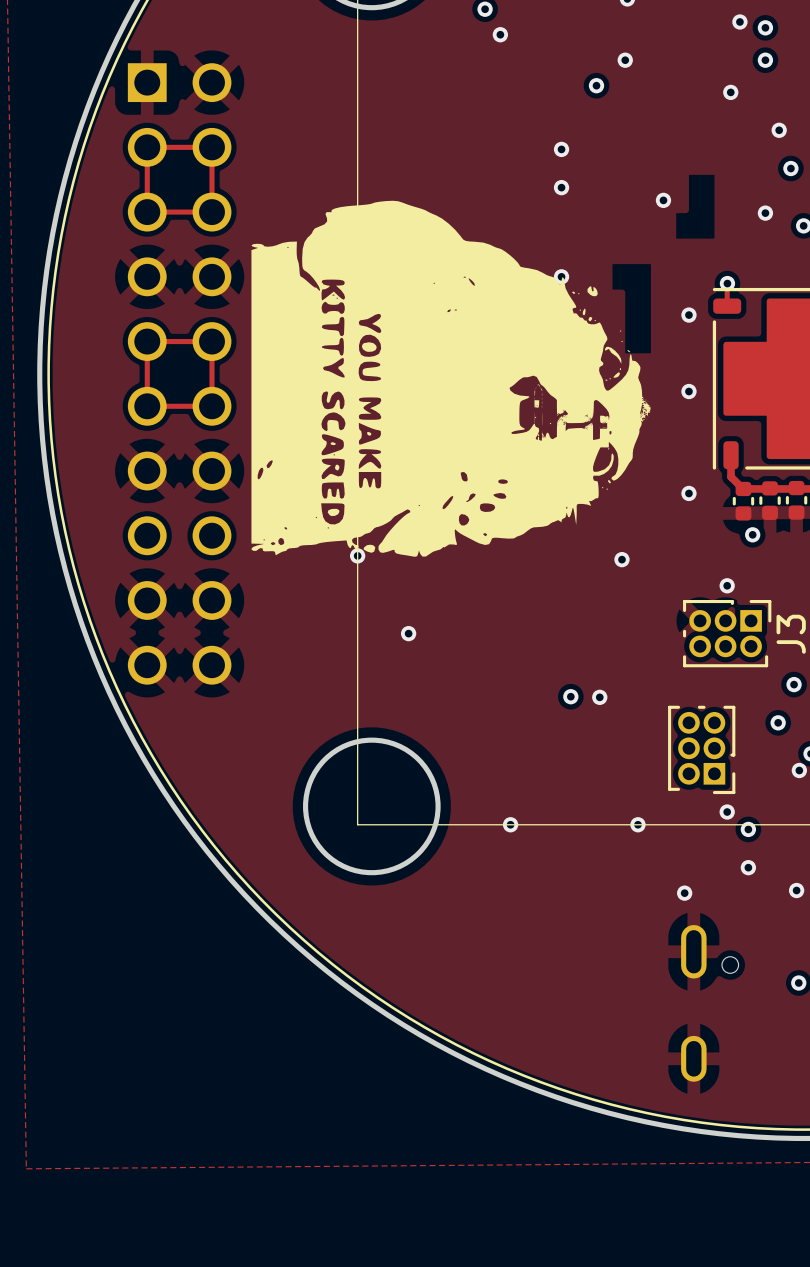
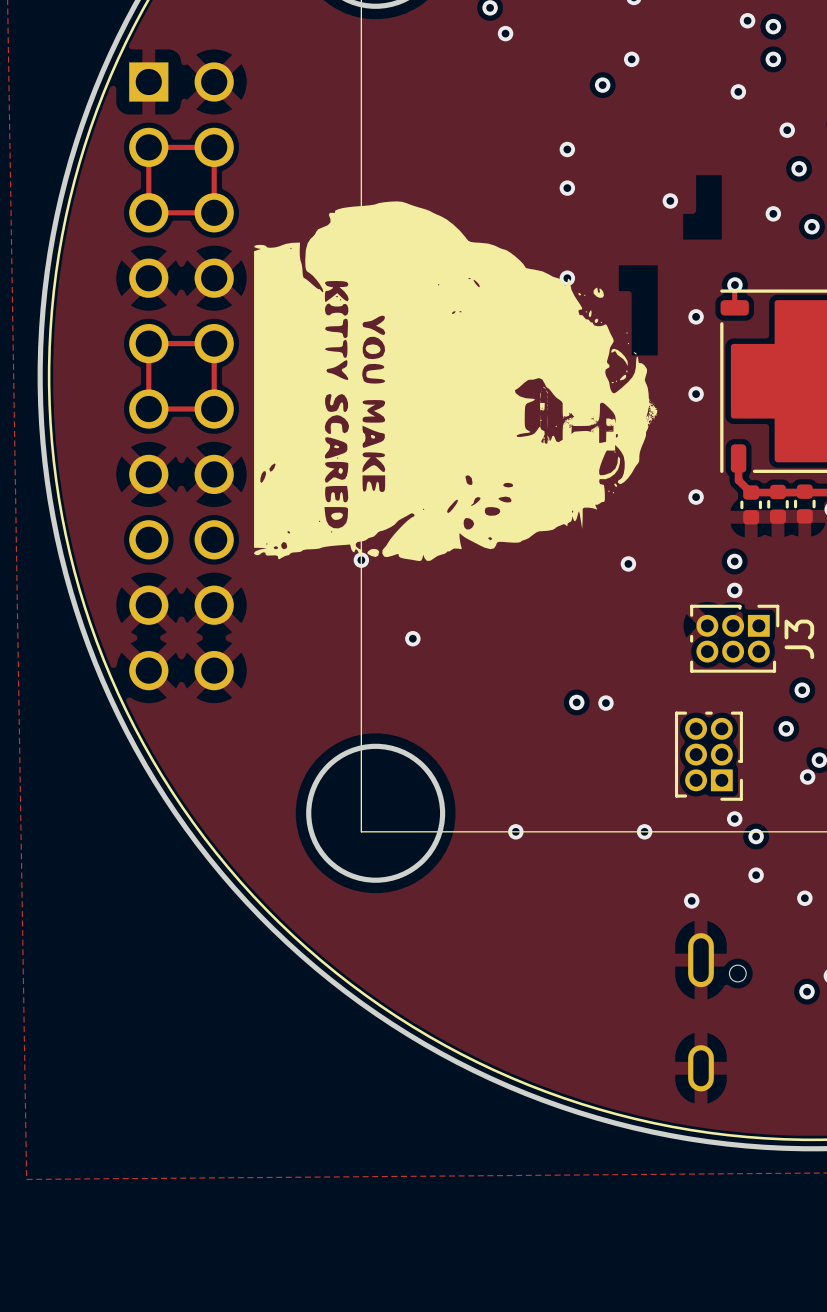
via position: (752, 534) -> (734, 561)

